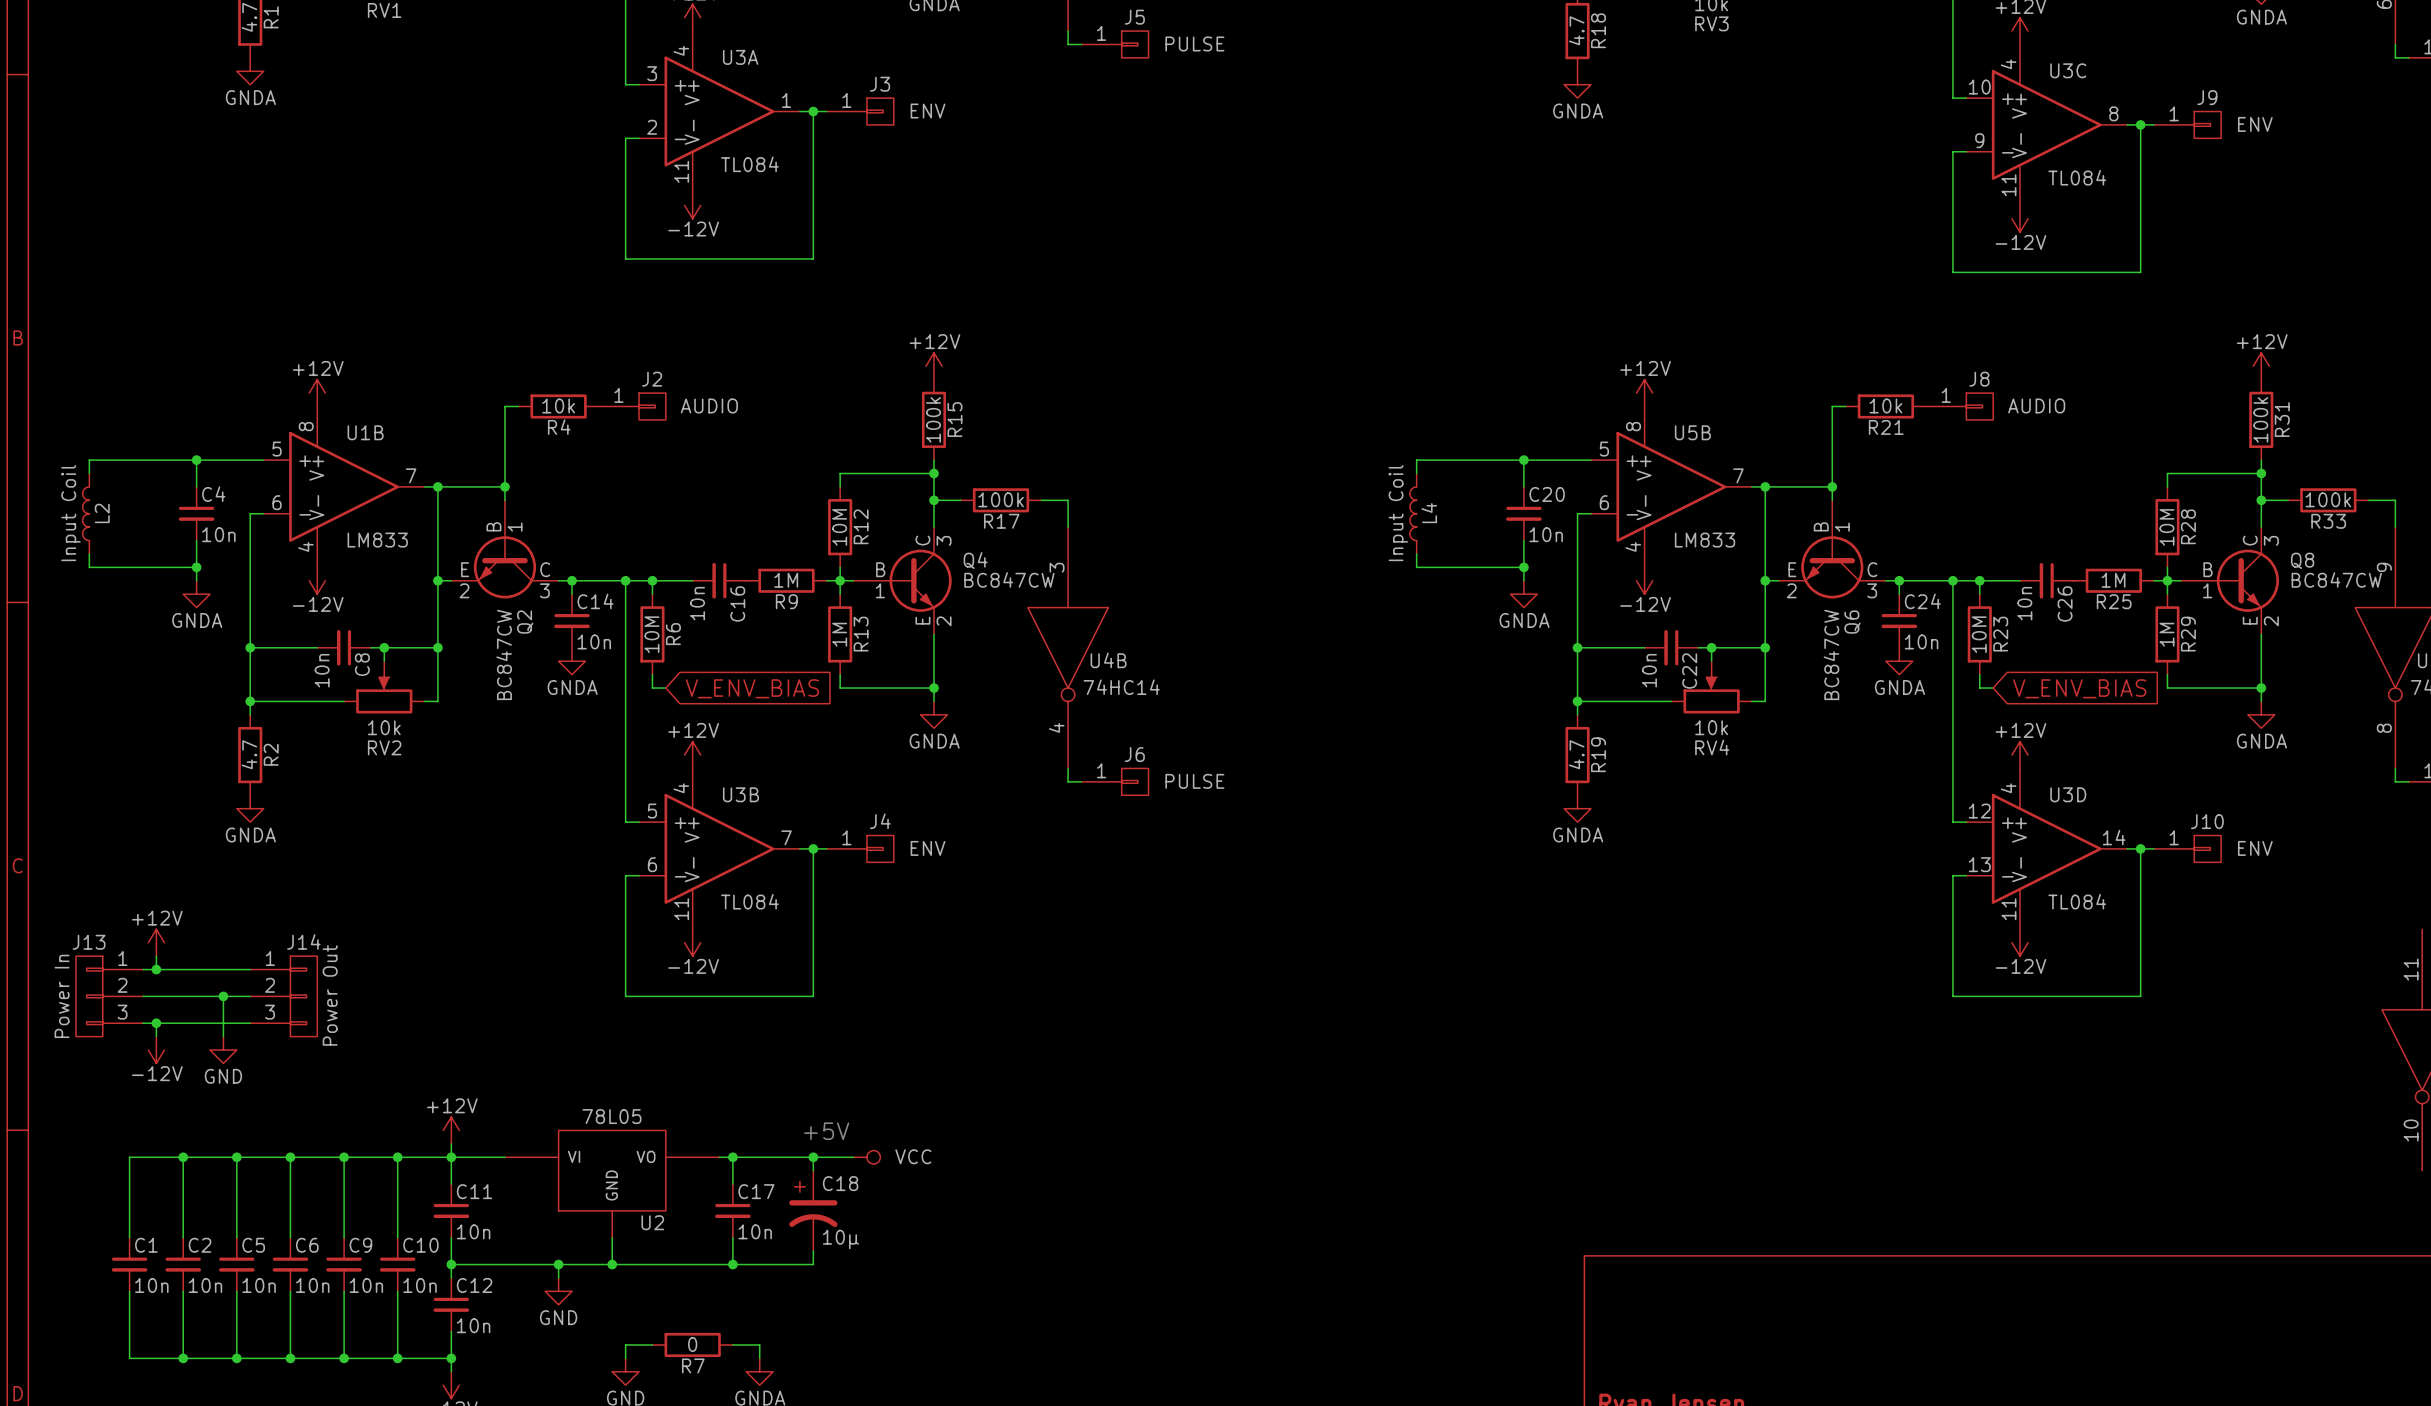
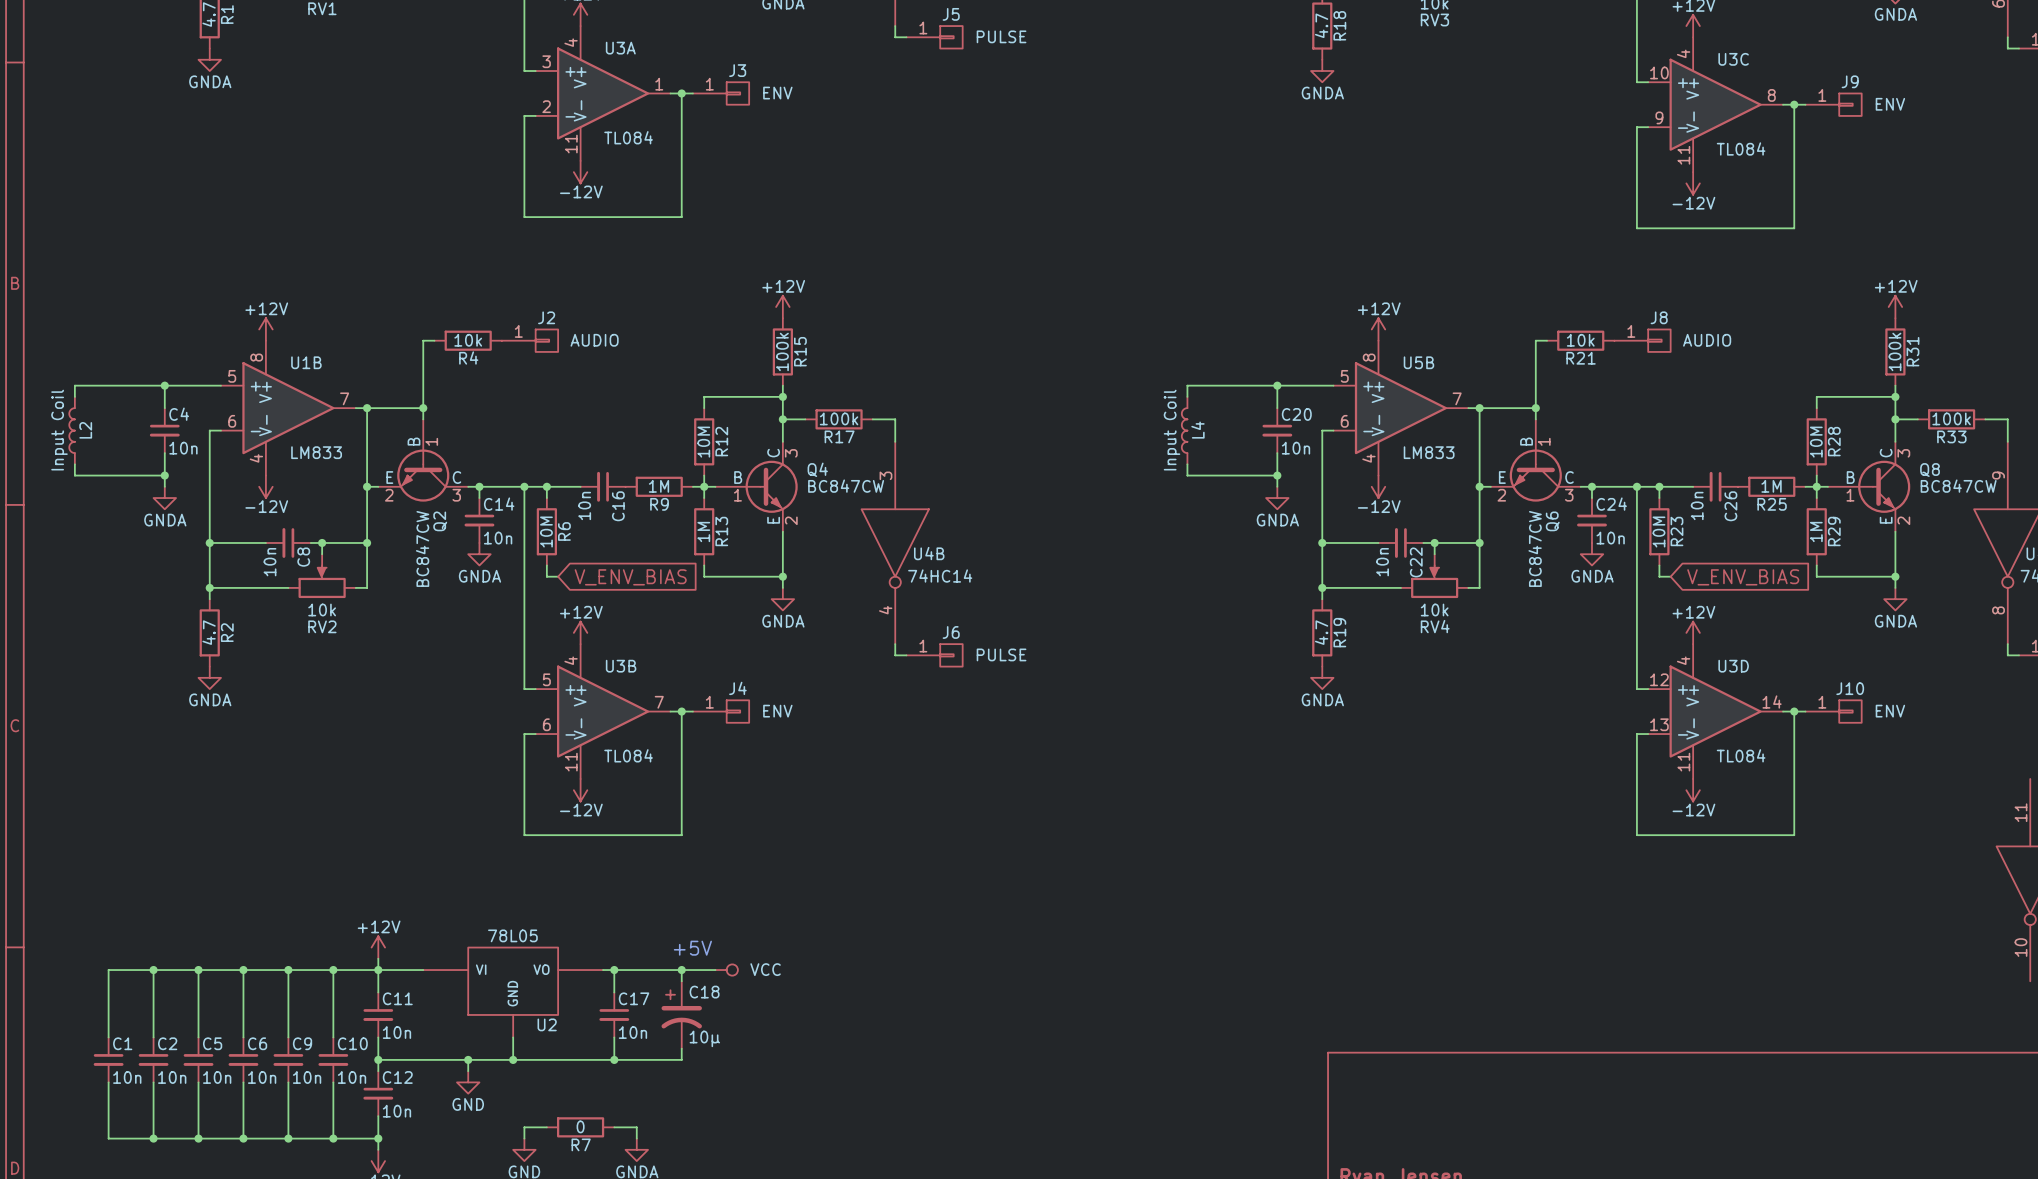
power symbol: +12V (156, 942) -> none
wire: (156, 956) (156, 969) -> none
wire: (142, 969) (250, 969) -> none
junction: (156, 969) -> none
J13: Power In (109, 996) -> none
wire: (142, 996) (250, 996) -> none
wire: (223, 996) (223, 1036) -> none
junction: (223, 996) -> none
J14: Power Out (283, 996) -> none
wire: (142, 1023) (250, 1023) -> none
wire: (156, 1023) (156, 1036) -> none
junction: (156, 1023) -> none
power symbol: -12V (156, 1050) -> none
power symbol: GND (223, 1050) -> none

